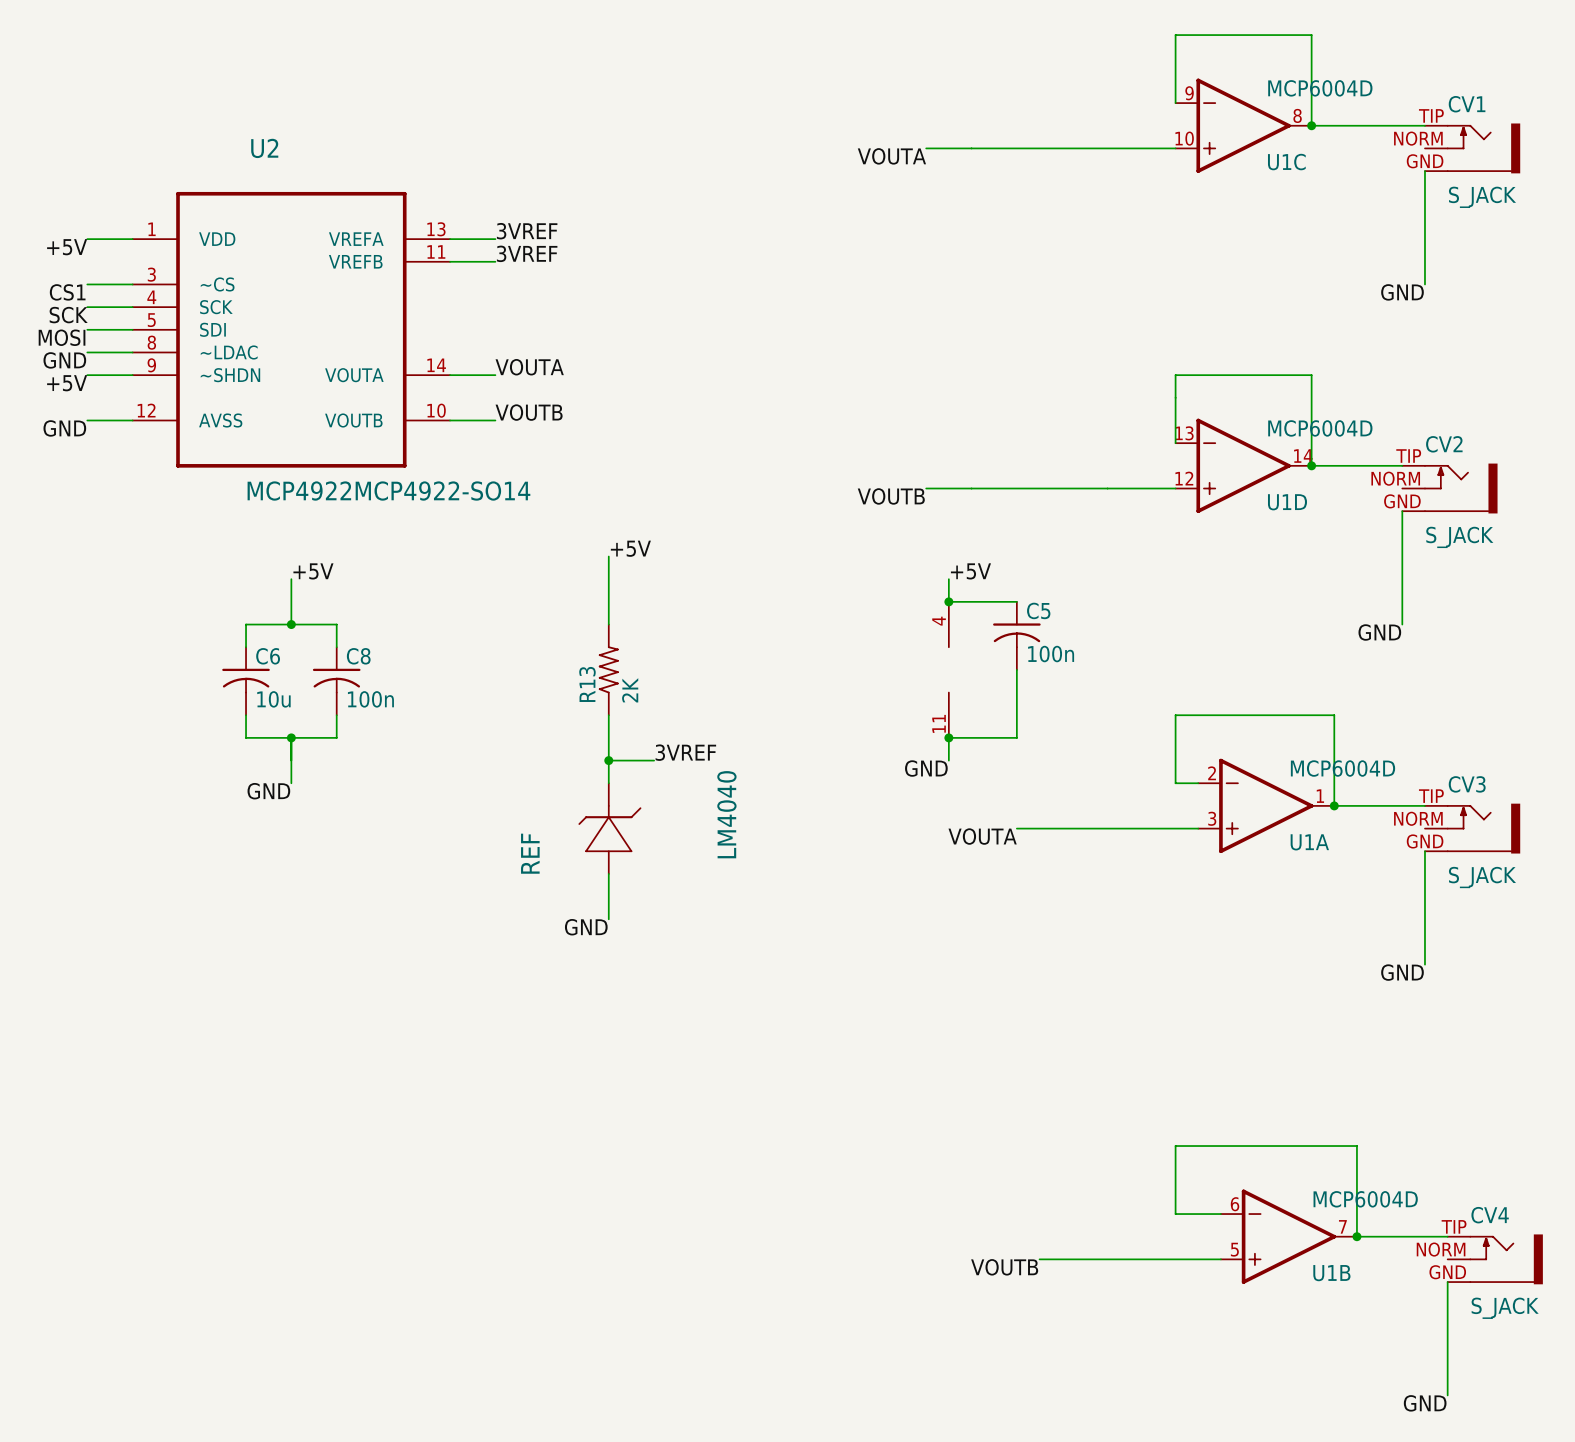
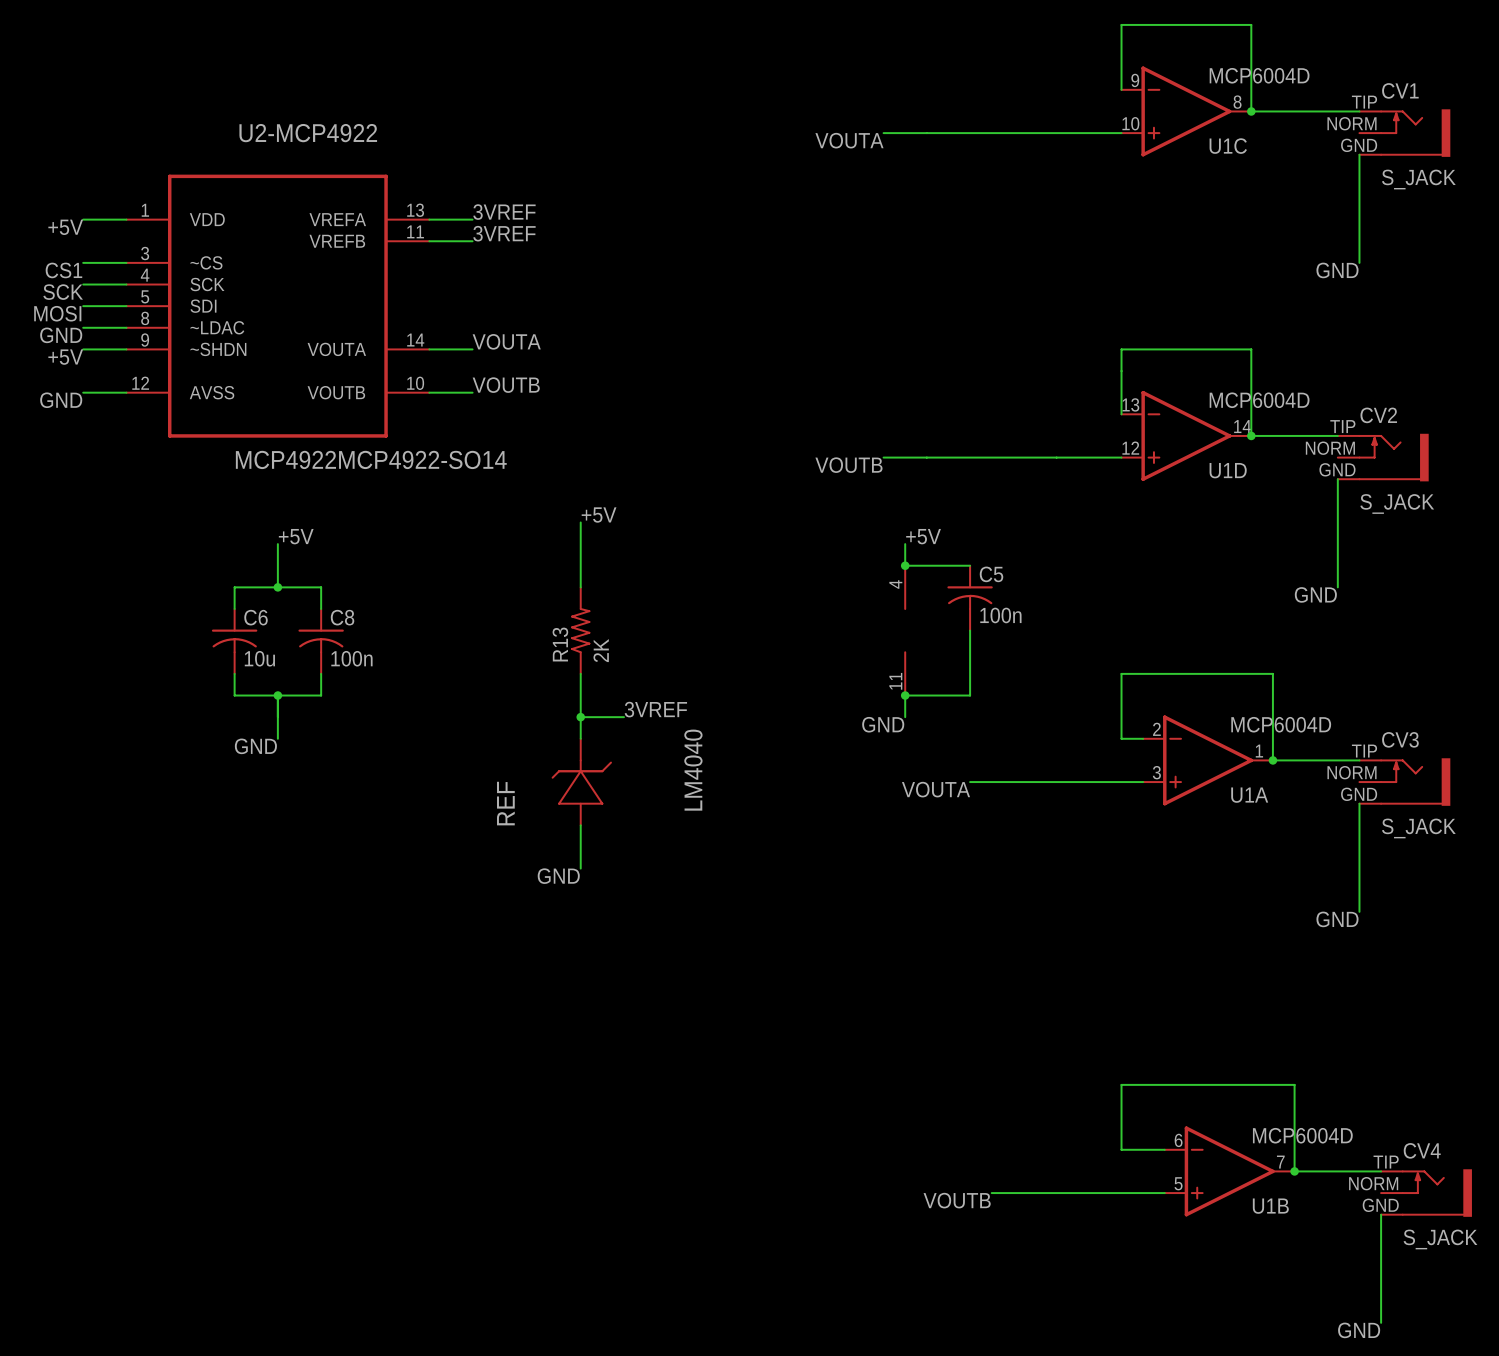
U2 name: U2 (264, 148) -> U2-MCP4922 (308, 133)

